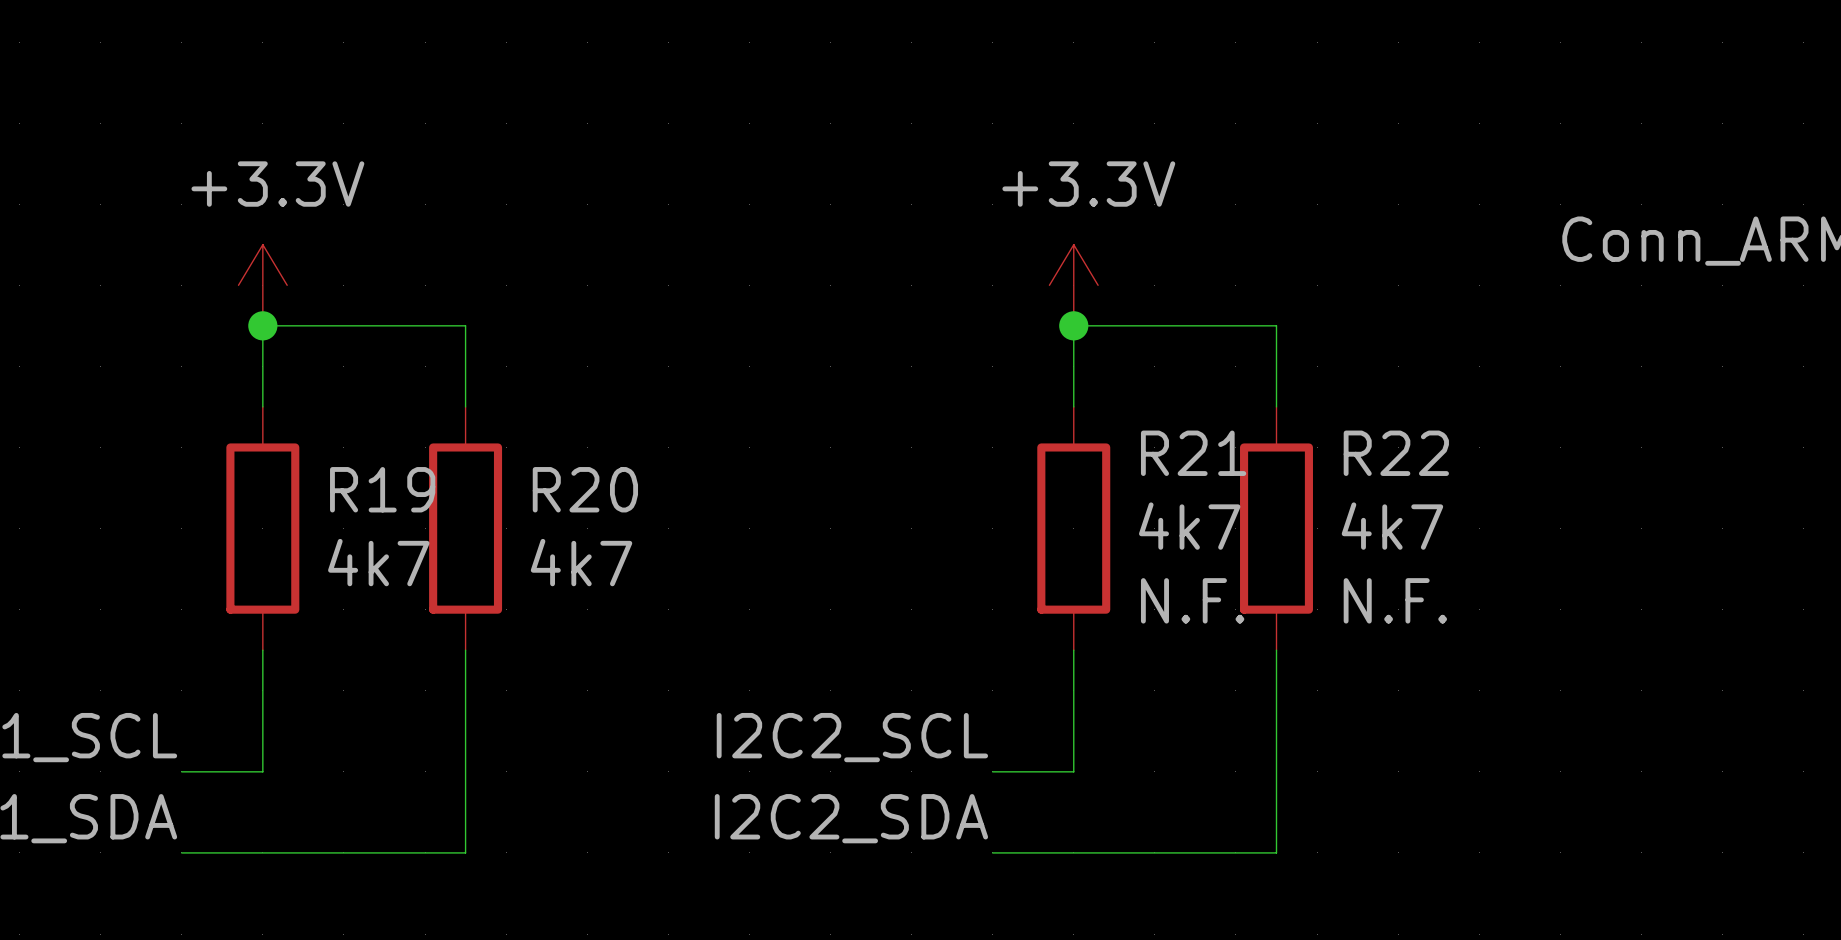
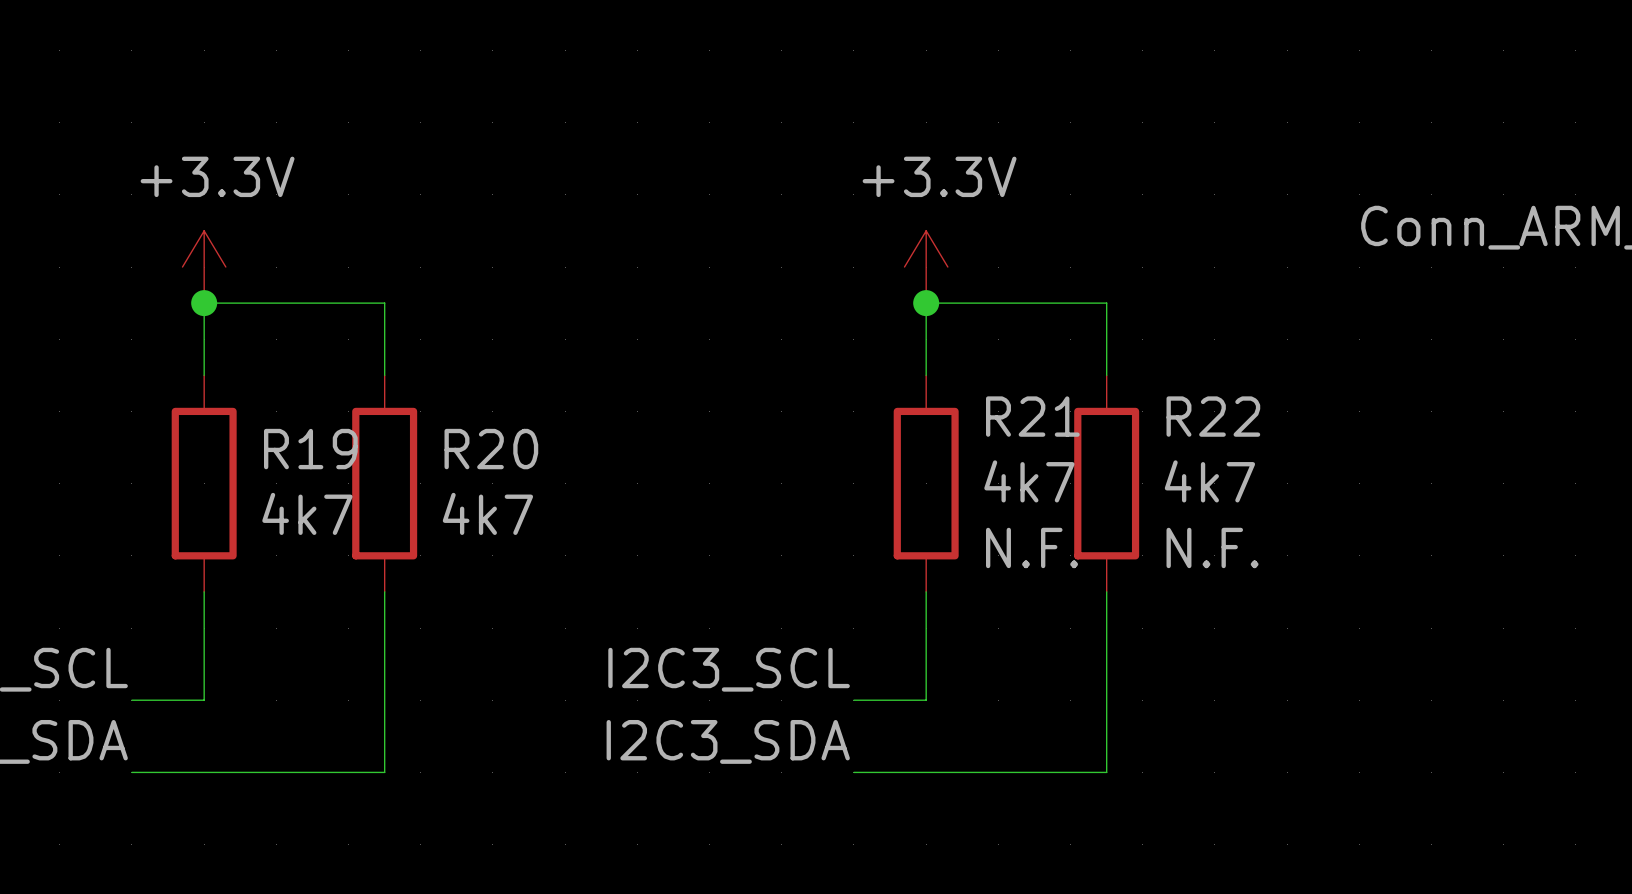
label: I2C2_SCL (852, 737) -> I2C3_SCL (729, 669)
label: I2C2_SDA (851, 818) -> I2C3_SDA (728, 741)

